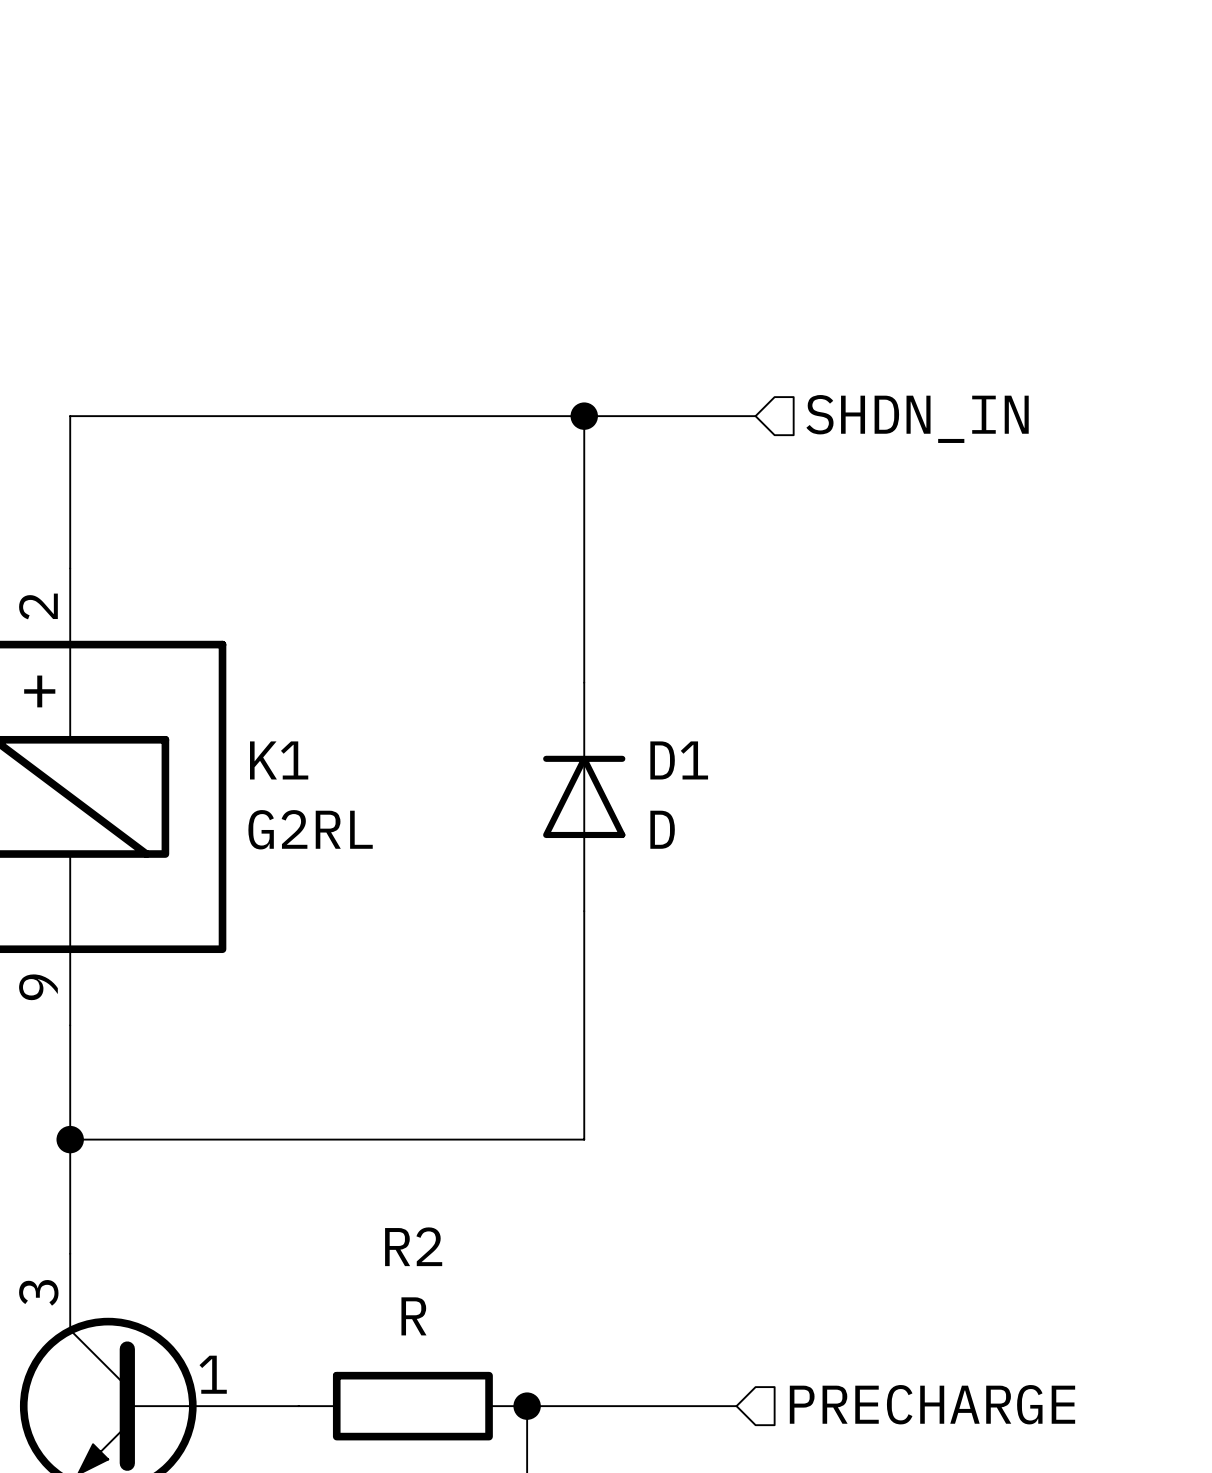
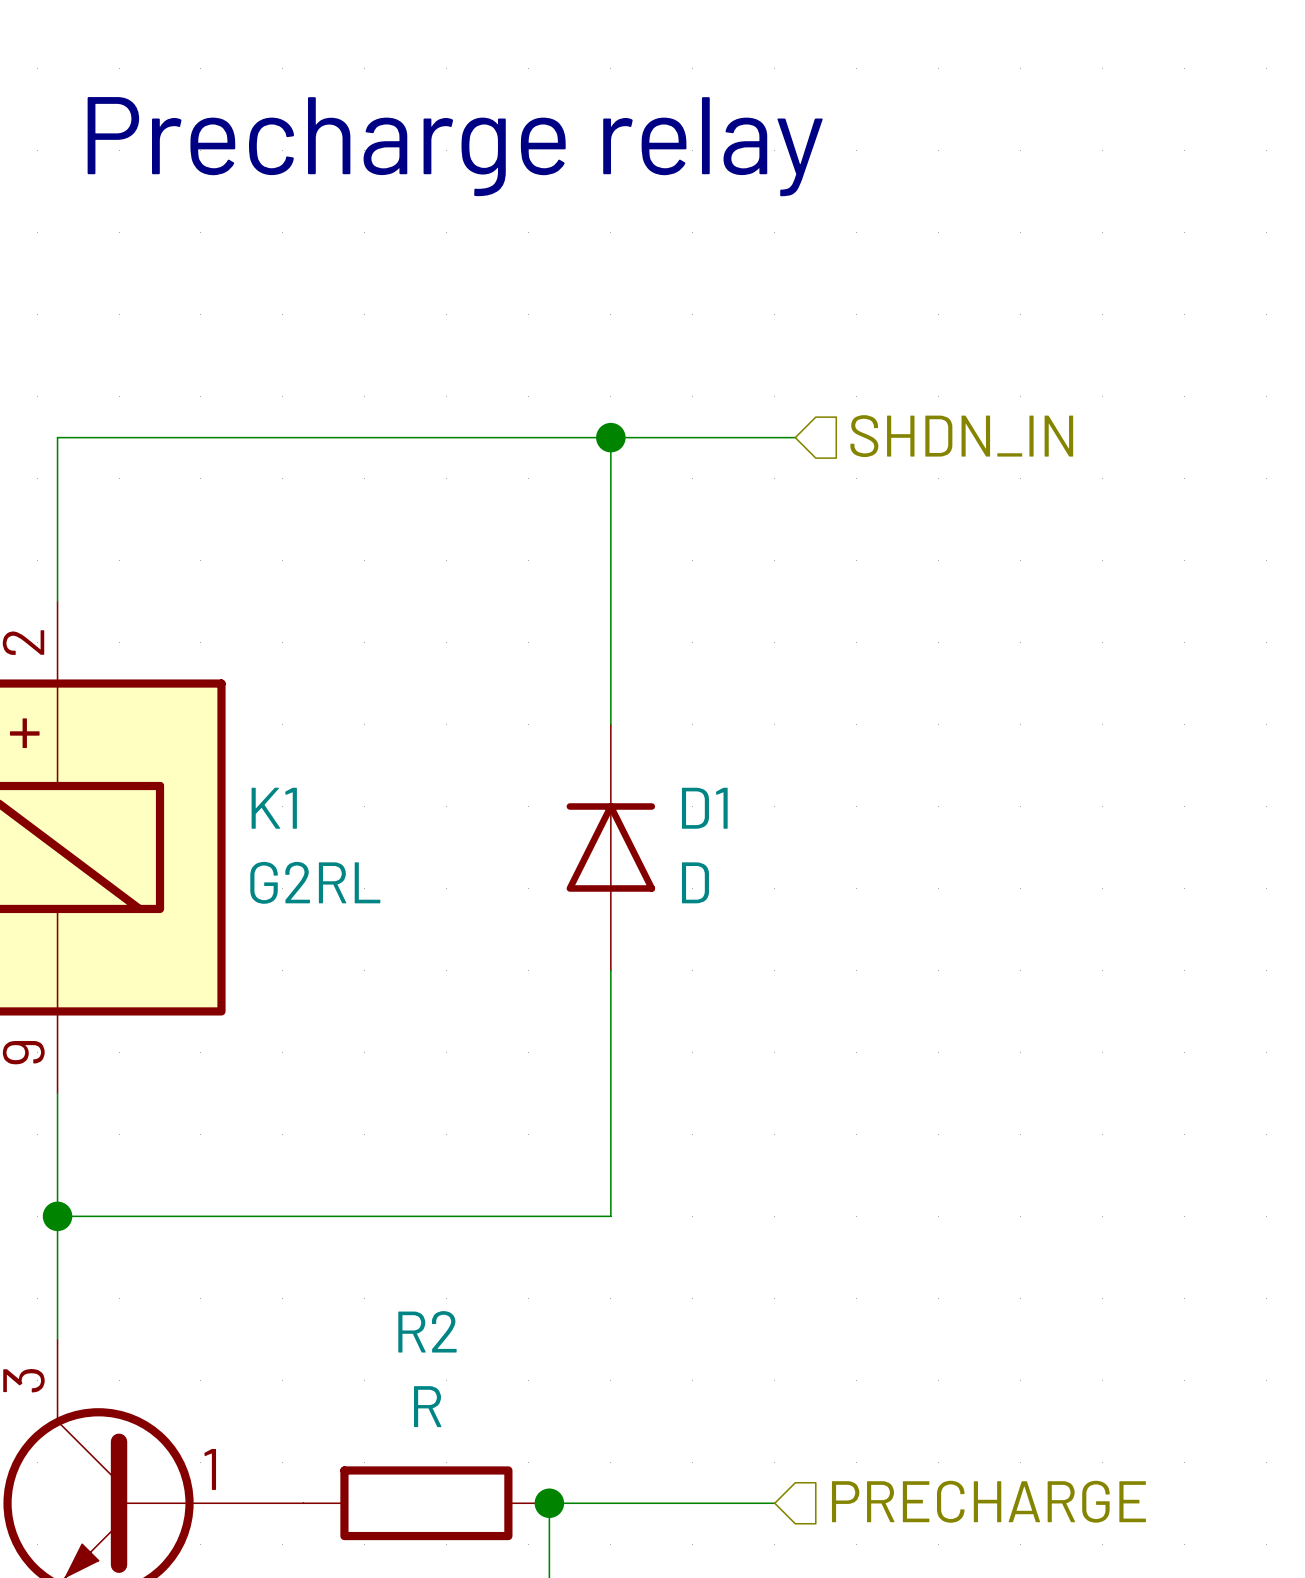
text: none -> Precharge relay (455, 146)

